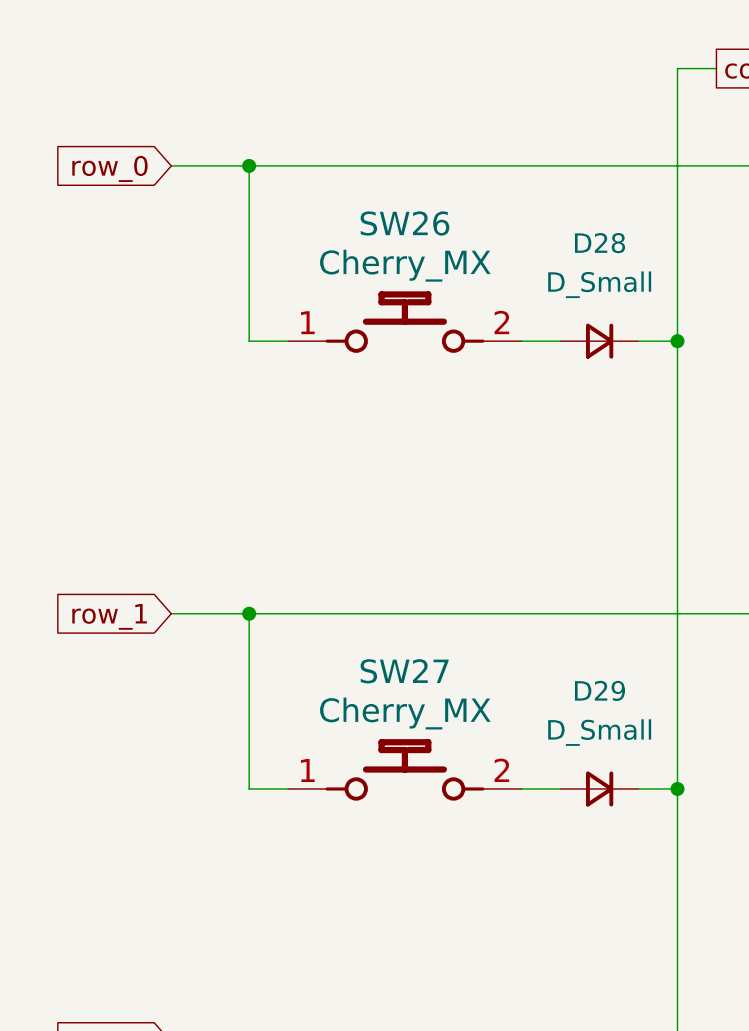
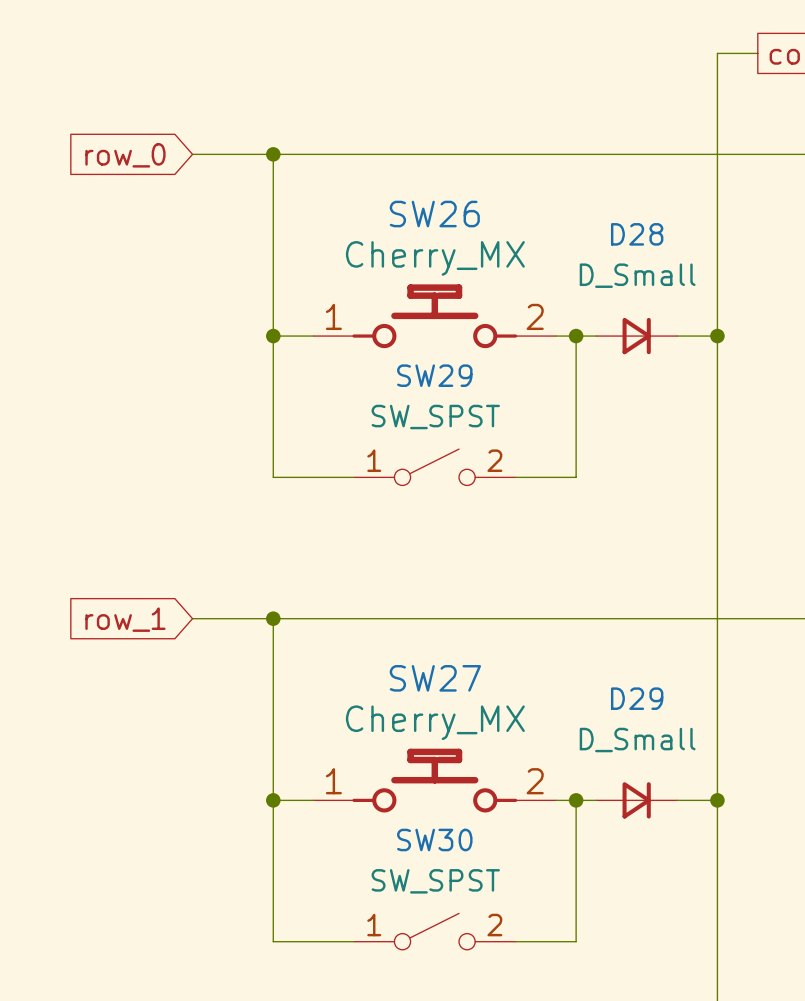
wire: none -> (273, 336) (273, 477) (354, 477)
junction: none -> (273, 336)
wire: none -> (576, 336) (576, 477) (515, 477)
junction: none -> (576, 336)
SW29: none -> SW_SPST (434, 467)
wire: none -> (273, 800) (273, 941) (354, 941)
junction: none -> (273, 800)
wire: none -> (576, 800) (576, 941) (515, 941)
junction: none -> (576, 800)
SW30: none -> SW_SPST (434, 931)

